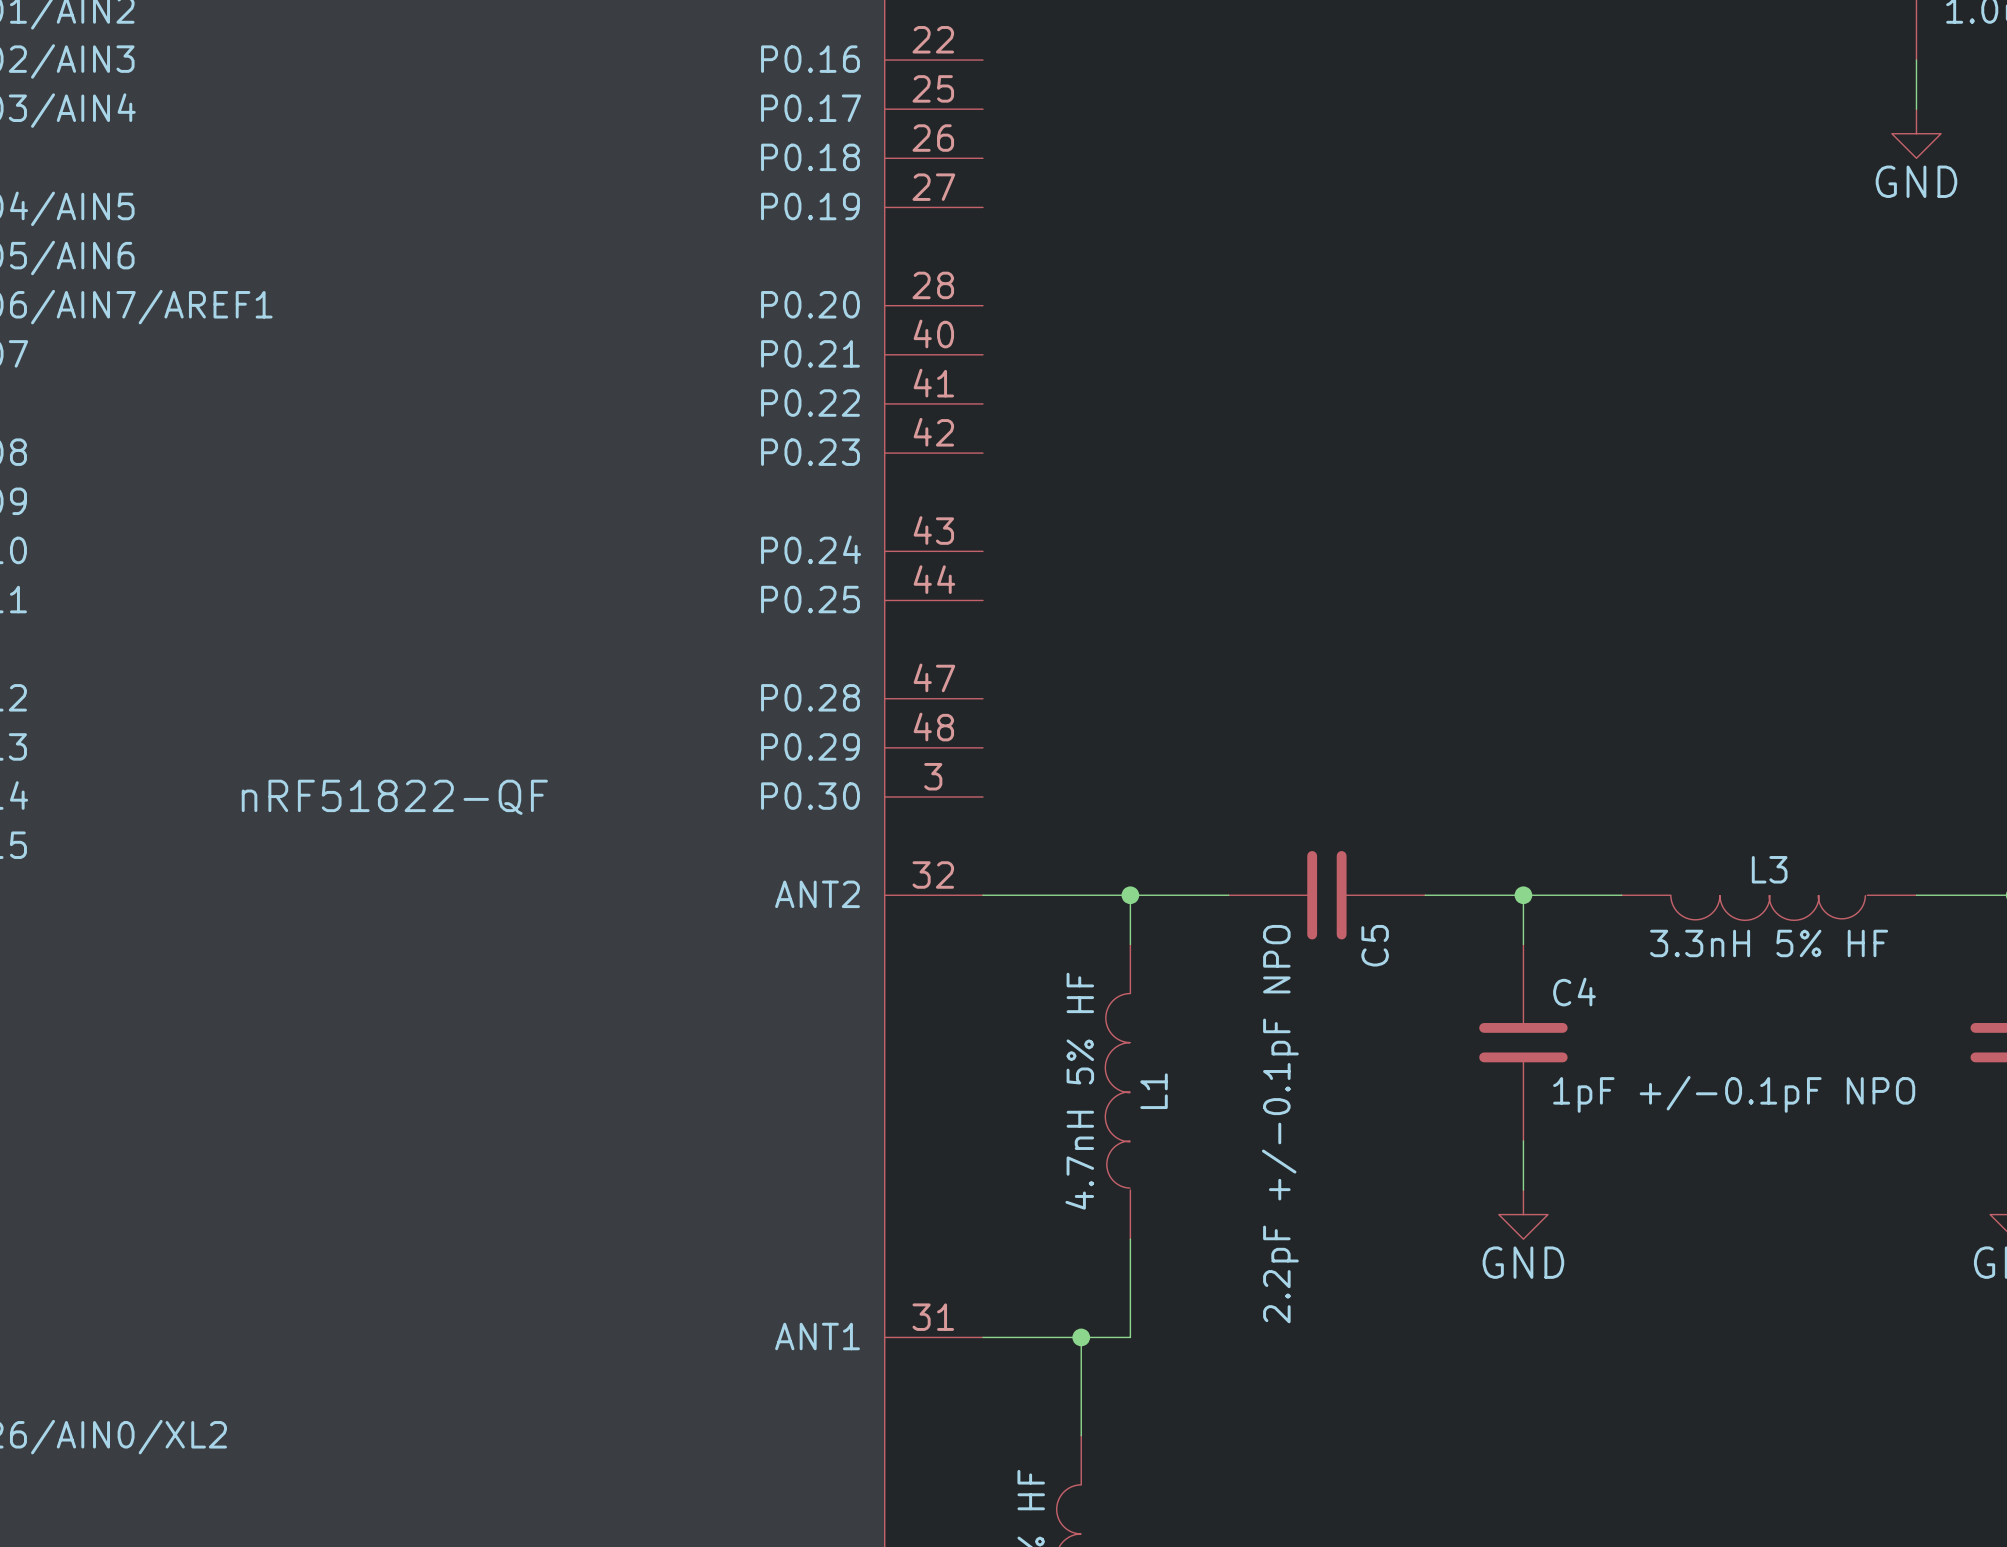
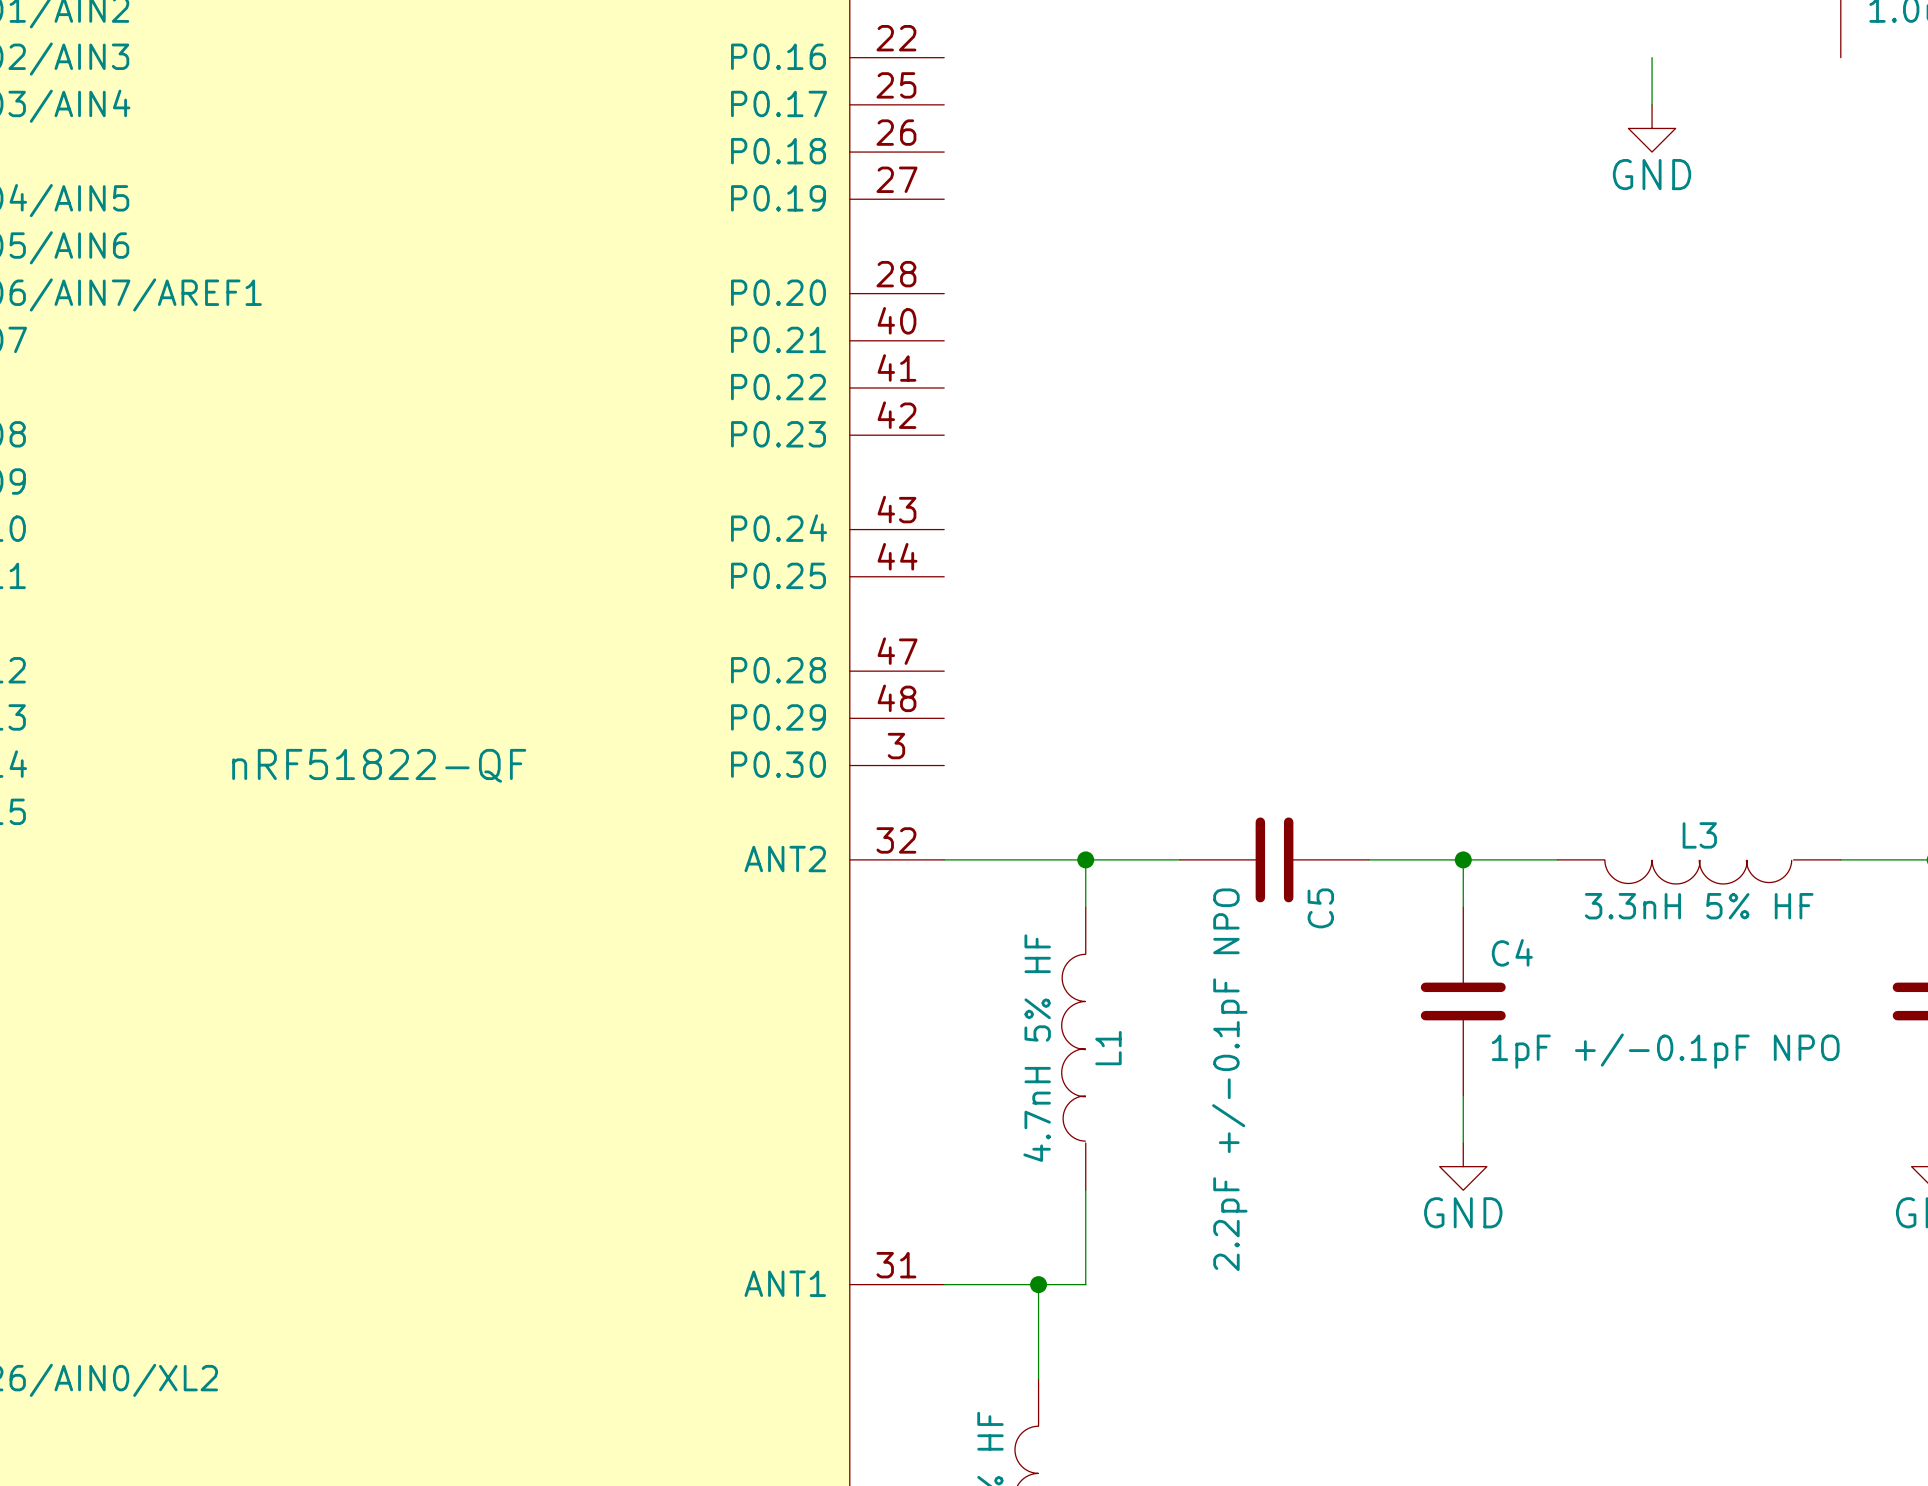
wire: (1916, 60) (1916, 109) -> (1652, 57) (1652, 104)
power symbol position: GND (1916, 133) -> GND (1652, 128)

